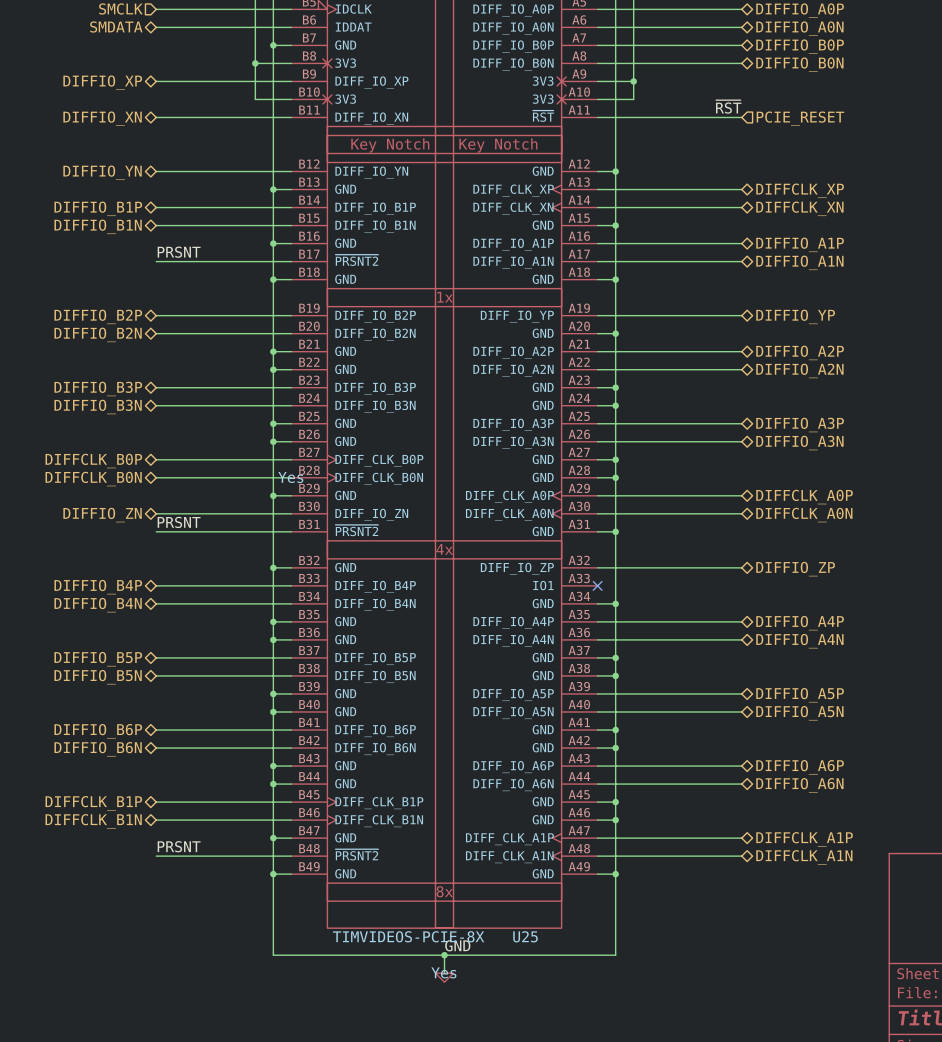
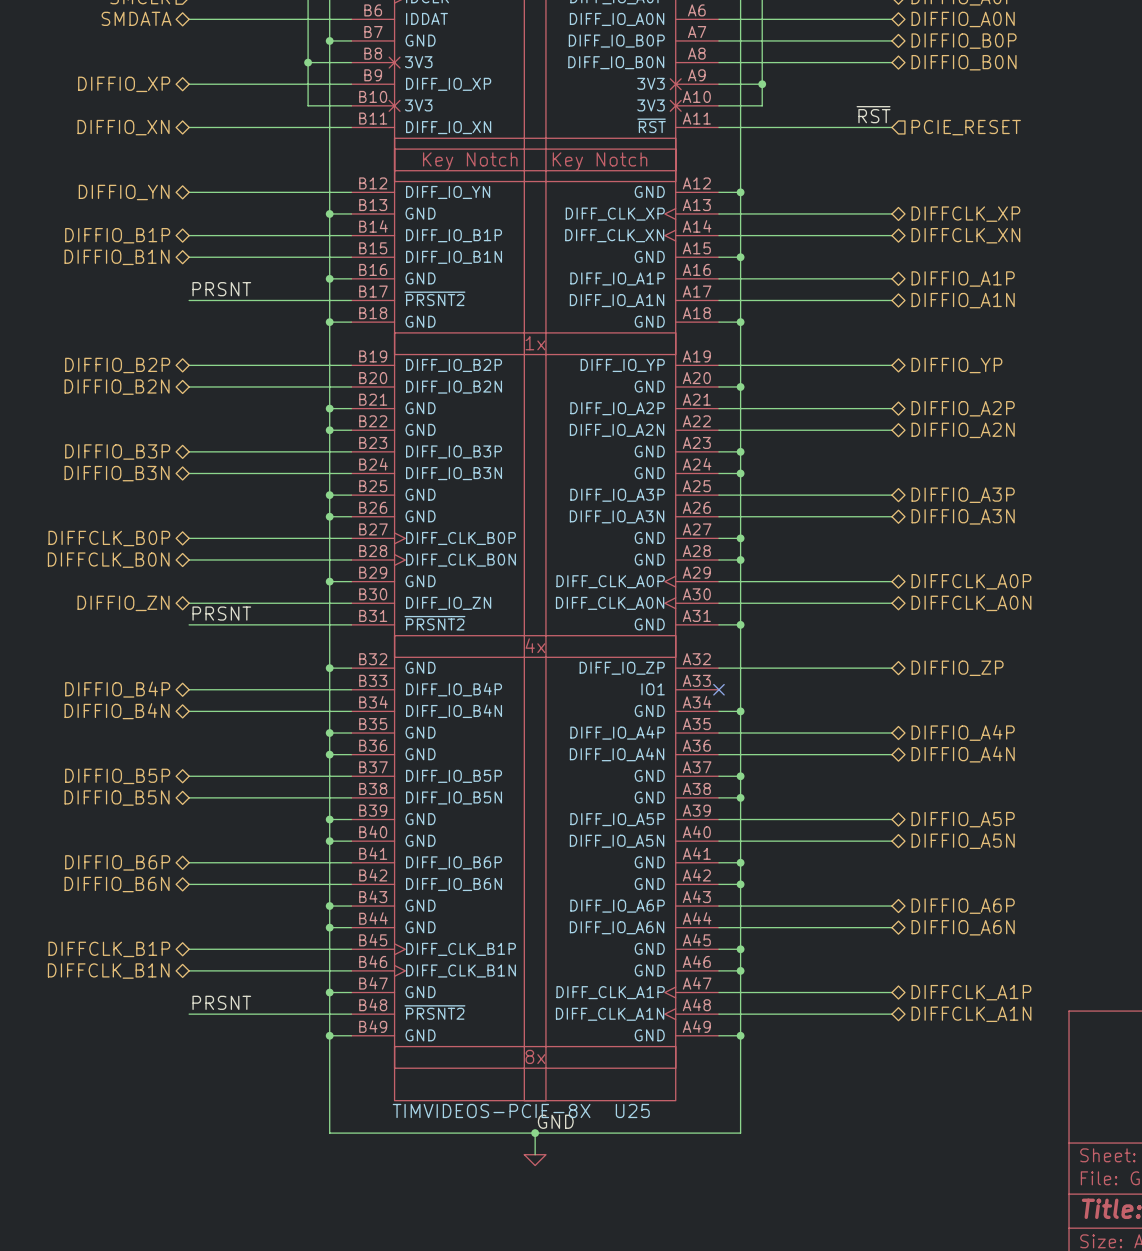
U25 text: Yes (290, 477) -> none
power symbol text: Yes (443, 972) -> none

